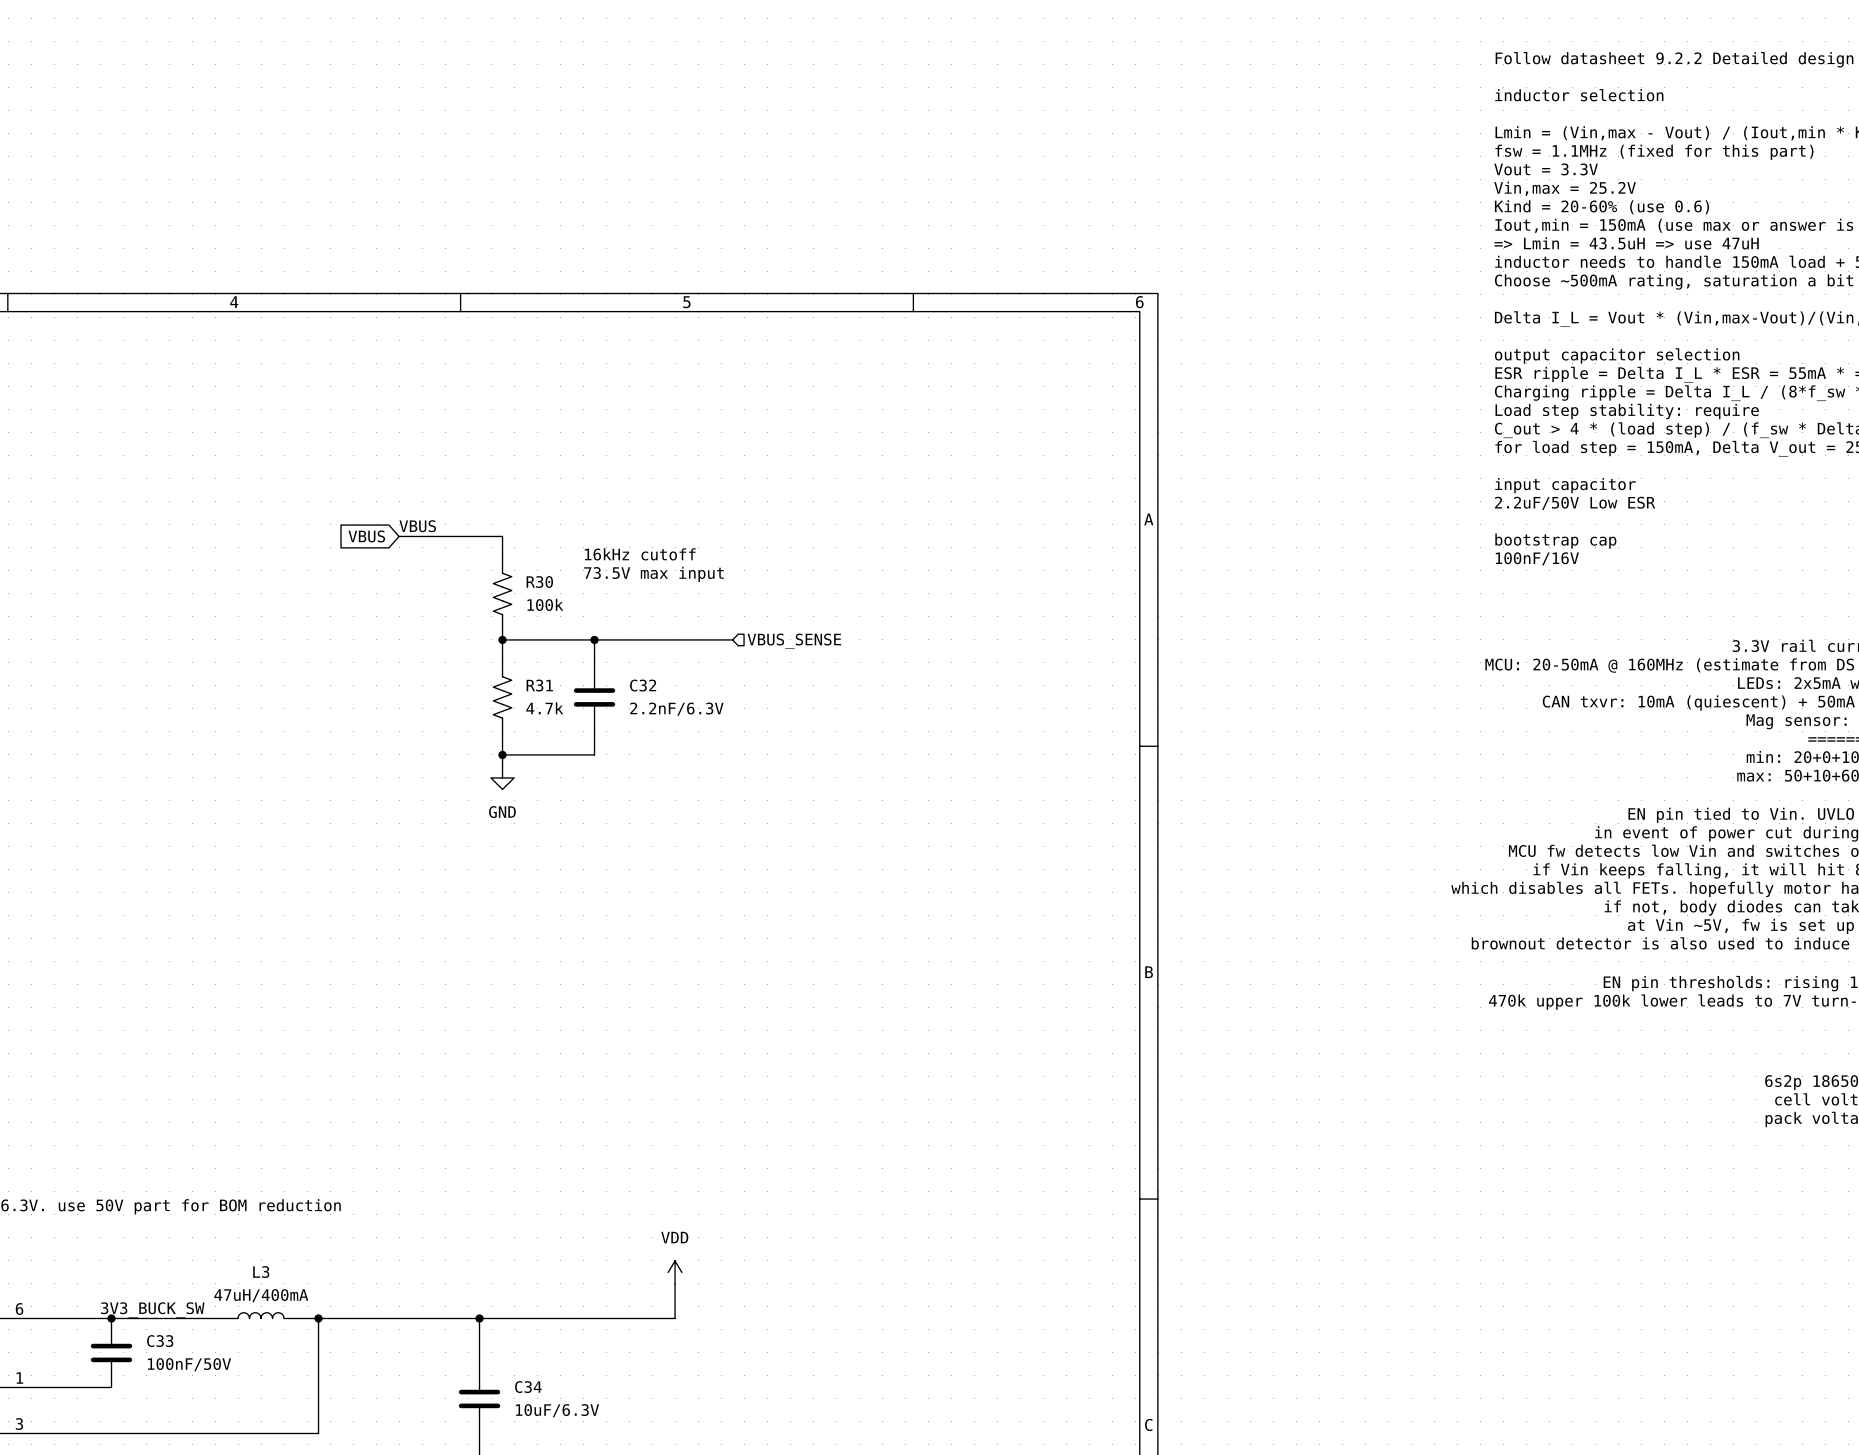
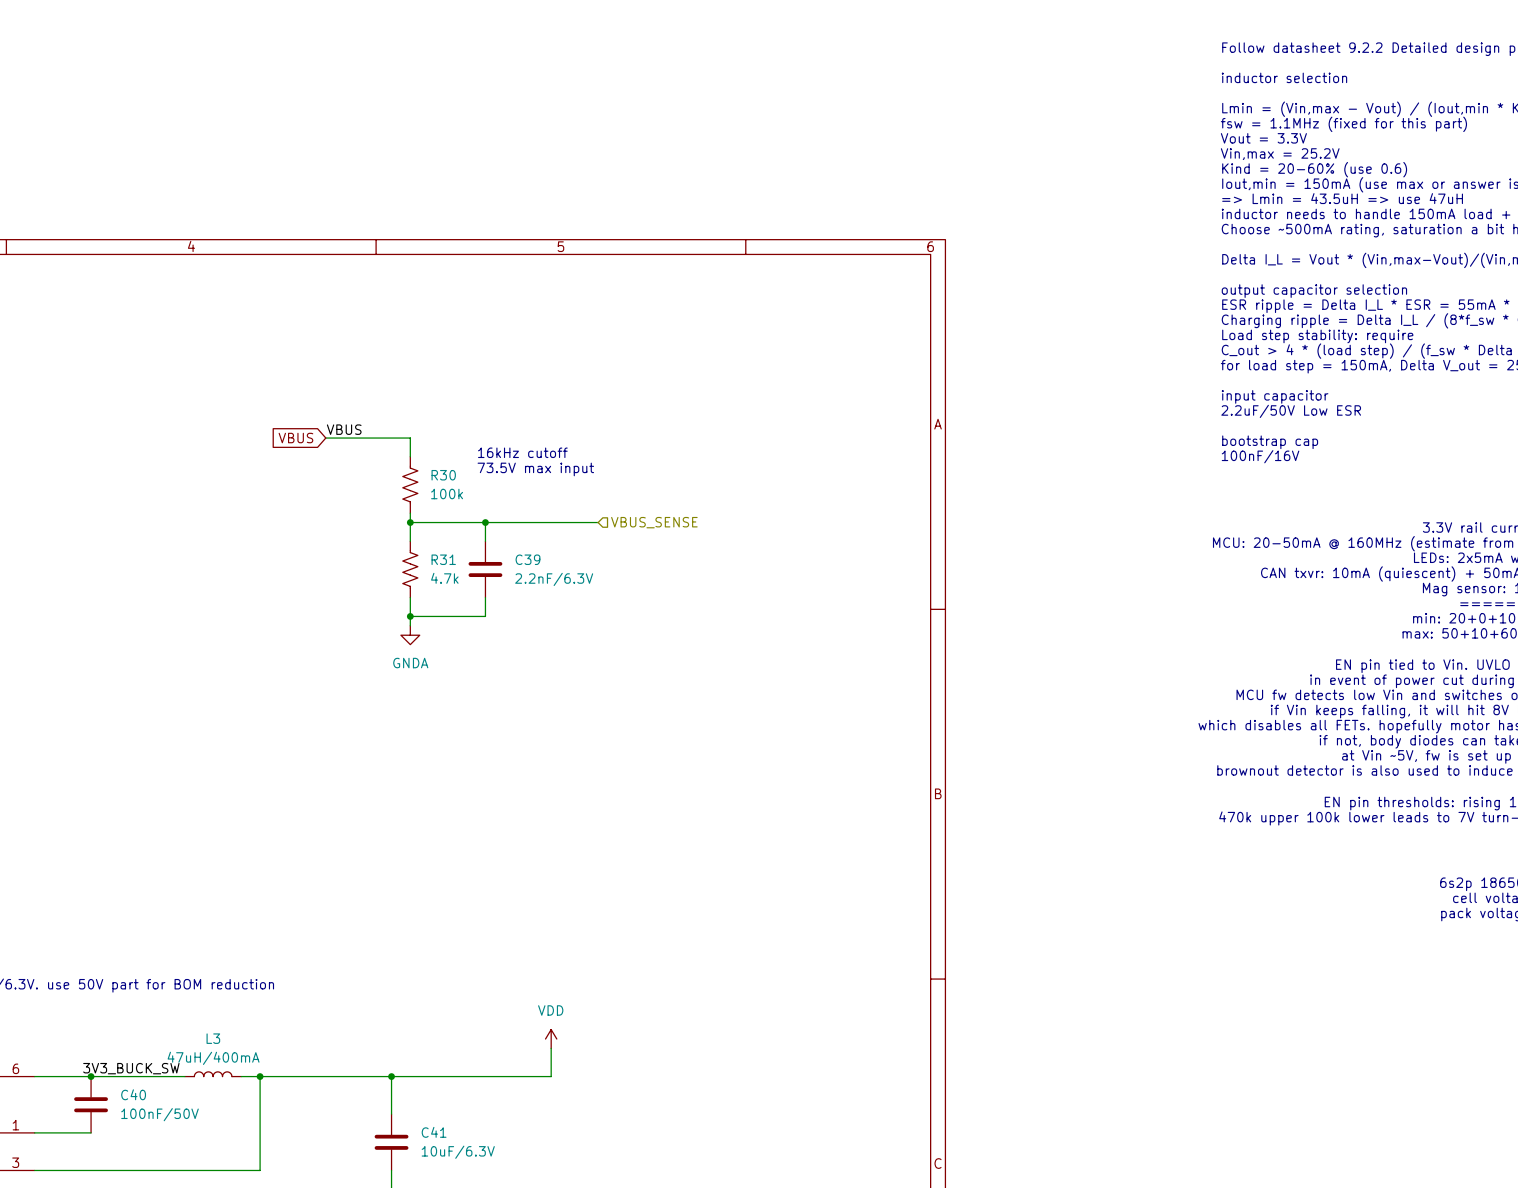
C32 name: C32 (643, 685) -> C39 (527, 559)
power symbol: GND (502, 777) -> GNDA (410, 635)
C33 name: C33 (160, 1341) -> C40 (133, 1094)
C34 name: C34 (528, 1387) -> C41 (434, 1132)

